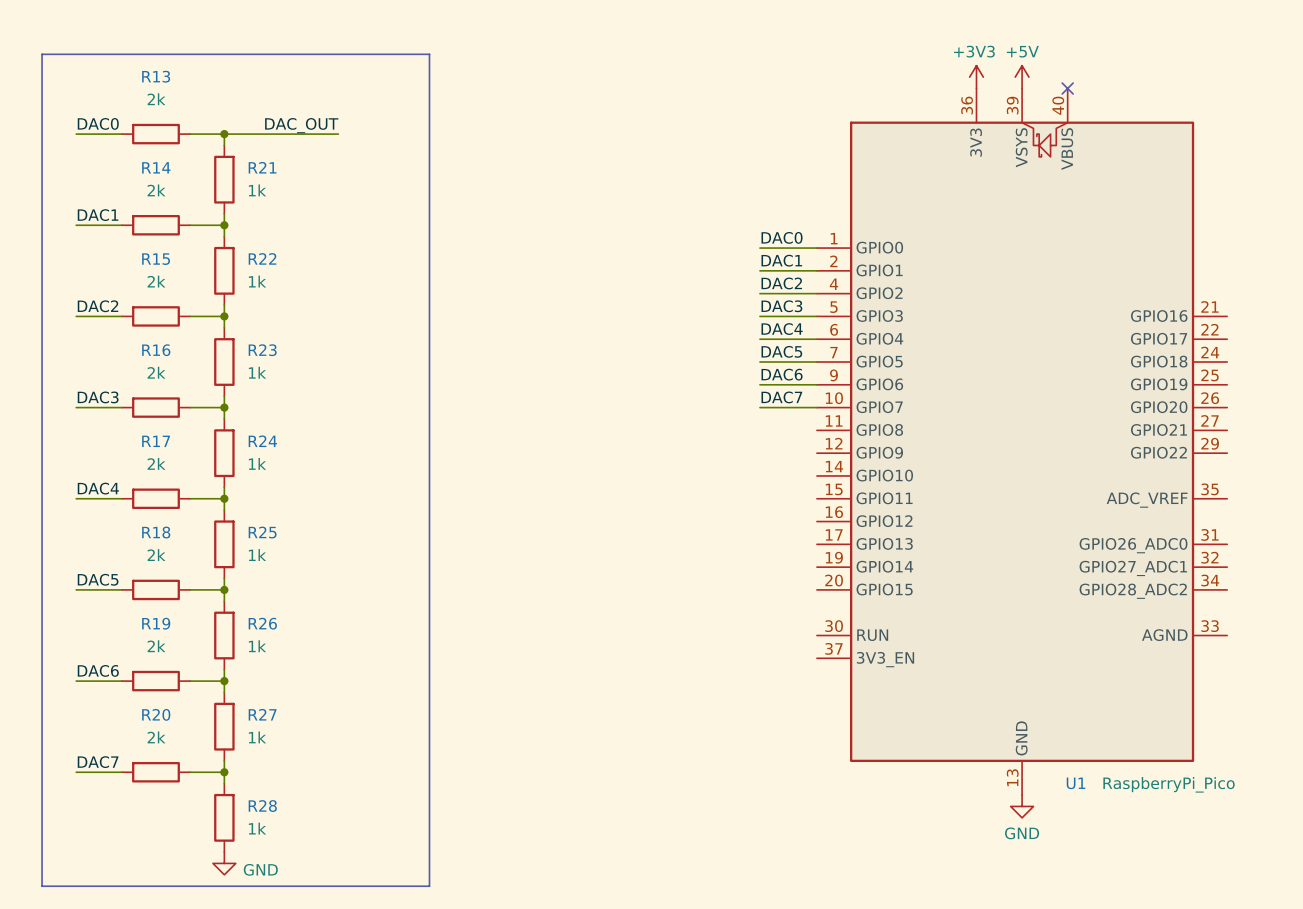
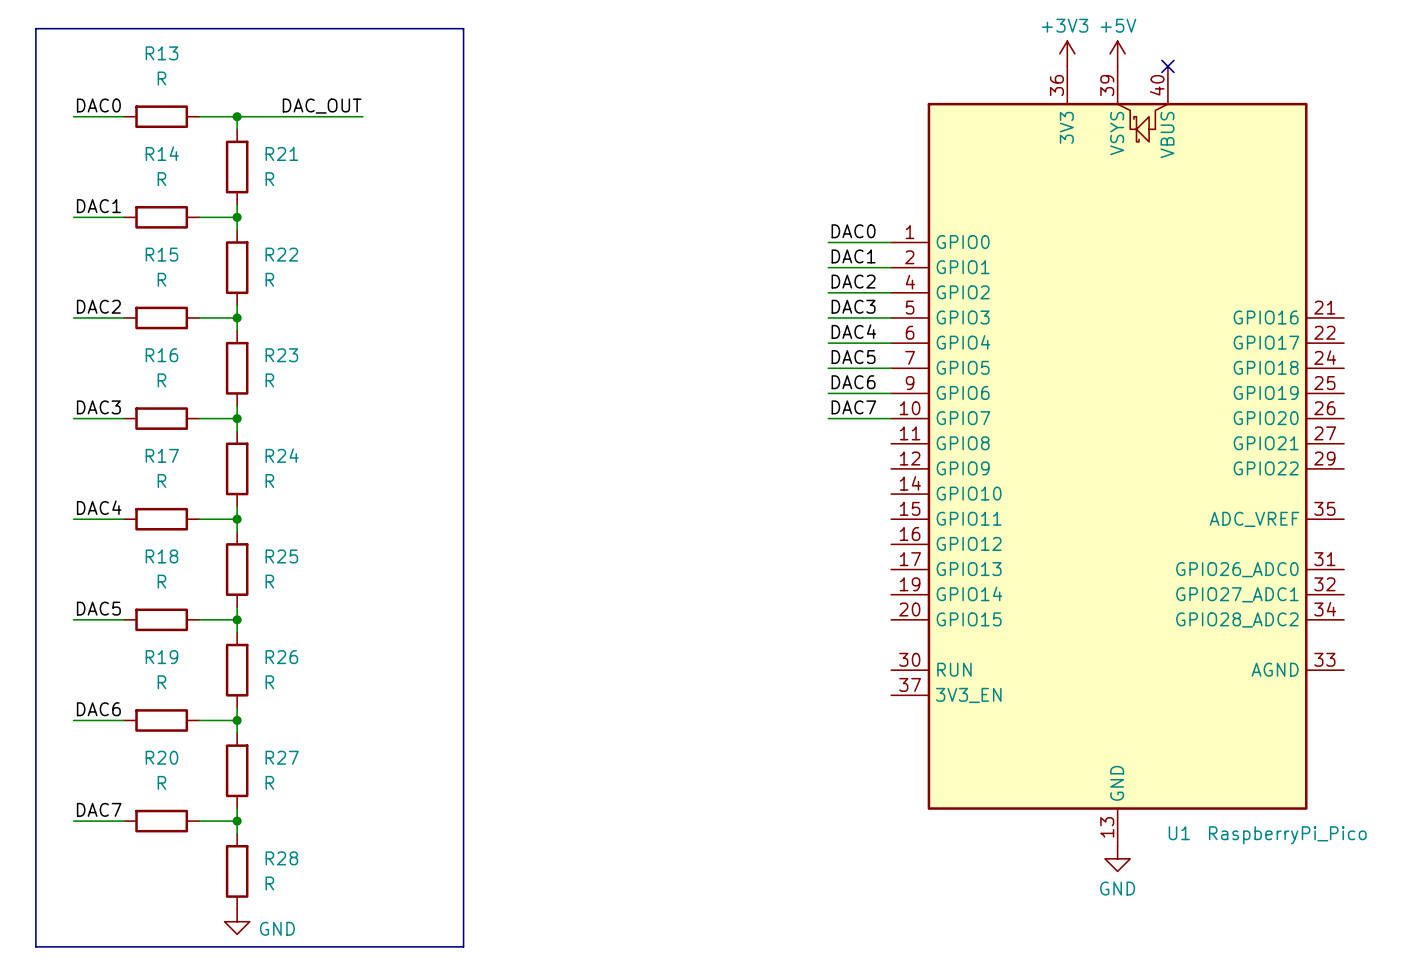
R13 value: 2k (156, 99) -> R (161, 78)
R14 value: 2k (156, 190) -> R (161, 179)
R21 value: 1k (257, 190) -> R (269, 179)
R15 value: 2k (156, 281) -> R (161, 279)
R22 value: 1k (257, 281) -> R (269, 279)
R16 value: 2k (156, 372) -> R (161, 380)
R23 value: 1k (257, 372) -> R (269, 380)
R17 value: 2k (156, 463) -> R (161, 481)
R24 value: 1k (257, 463) -> R (269, 481)
R18 value: 2k (156, 555) -> R (161, 581)
R25 value: 1k (257, 555) -> R (269, 581)
R19 value: 2k (156, 646) -> R (161, 682)
R26 value: 1k (257, 646) -> R (269, 682)
R20 value: 2k (156, 737) -> R (161, 782)
R27 value: 1k (257, 737) -> R (269, 782)
R28 value: 1k (257, 828) -> R (269, 883)

